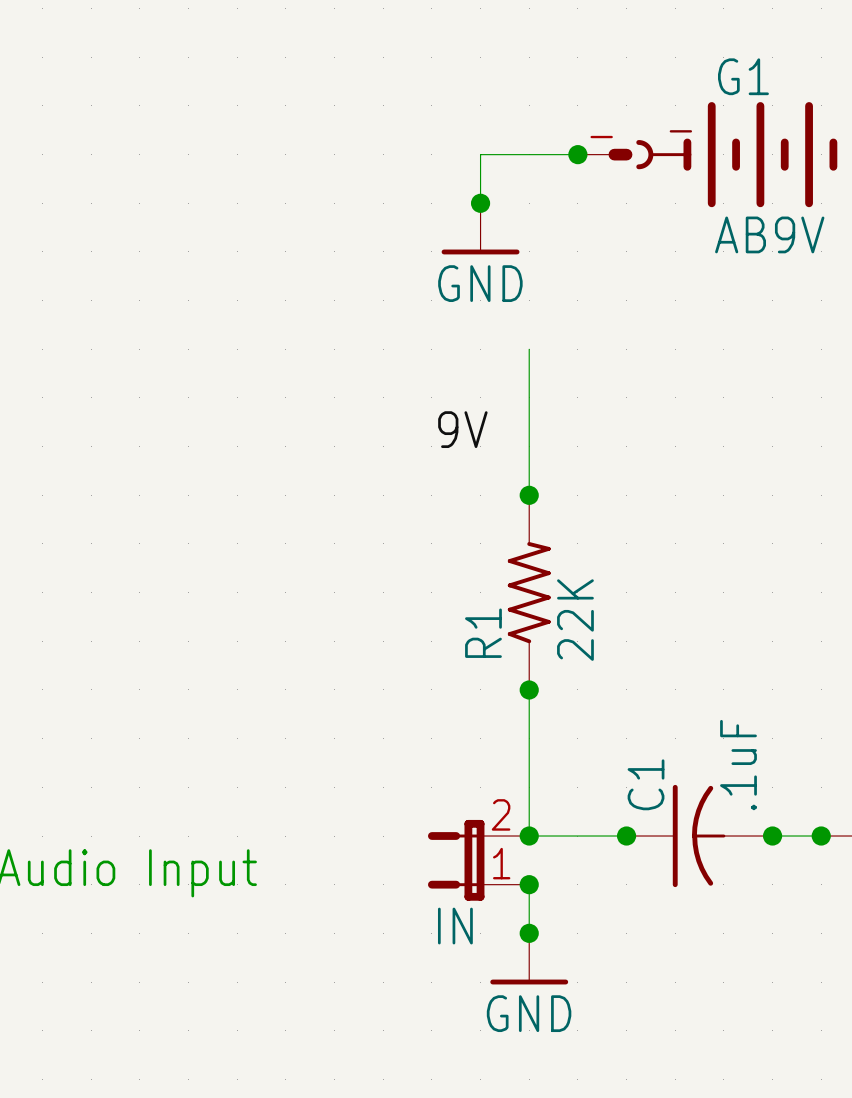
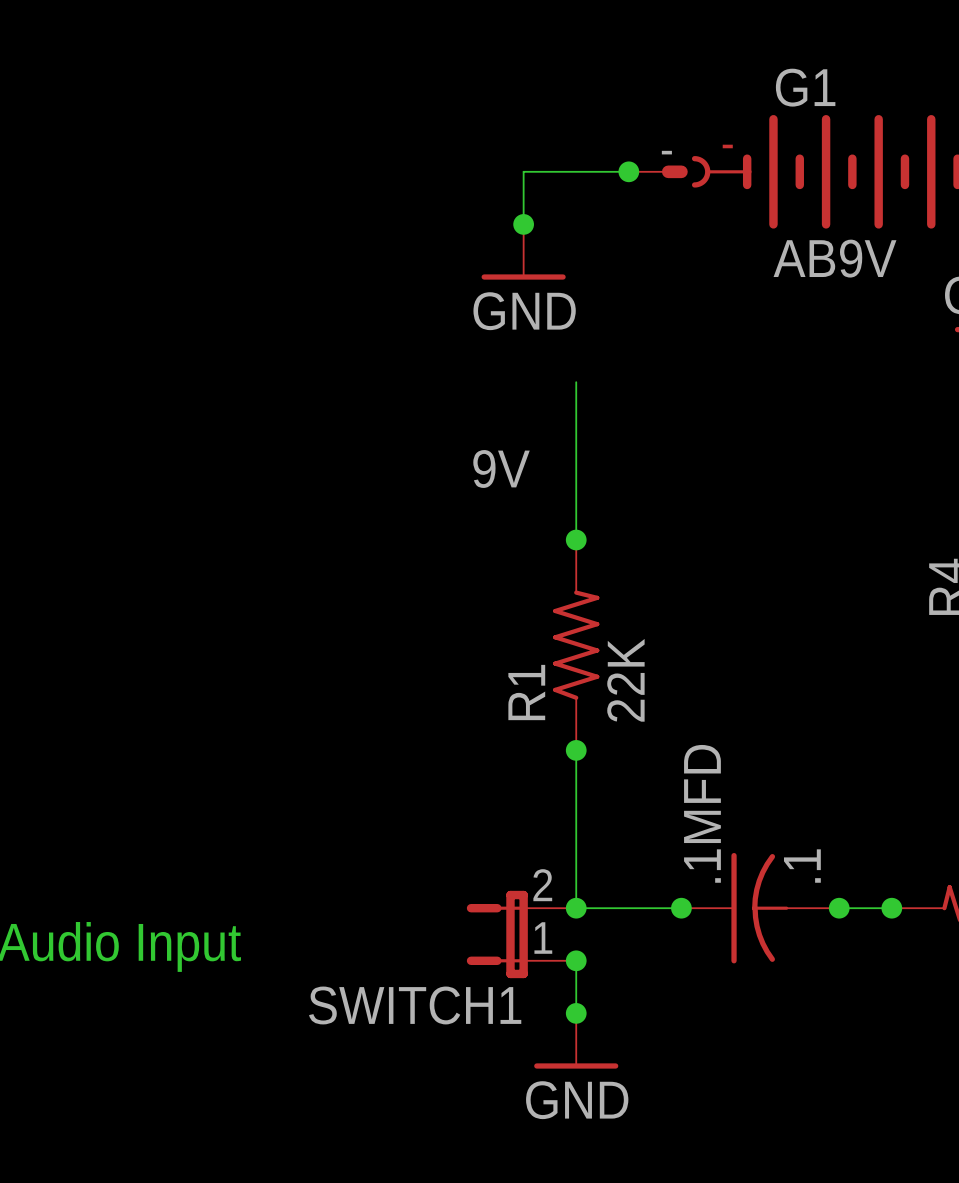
C1 value: .1uF (738, 765) -> .1 (802, 866)
C1 name: C1 (646, 784) -> .1MFD (702, 813)
IN name: IN (455, 926) -> SWITCH1 (415, 1005)

